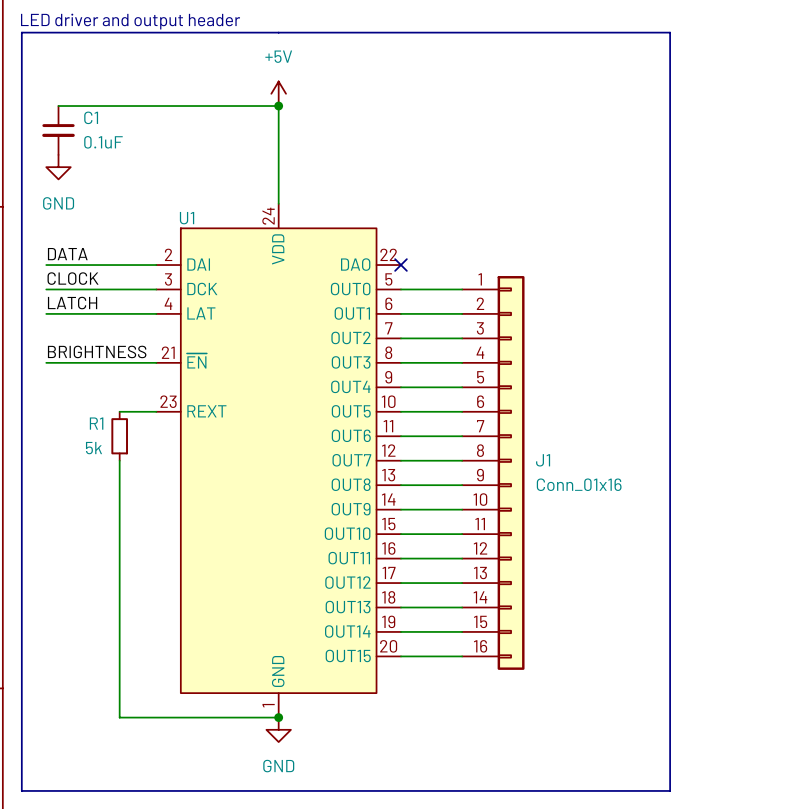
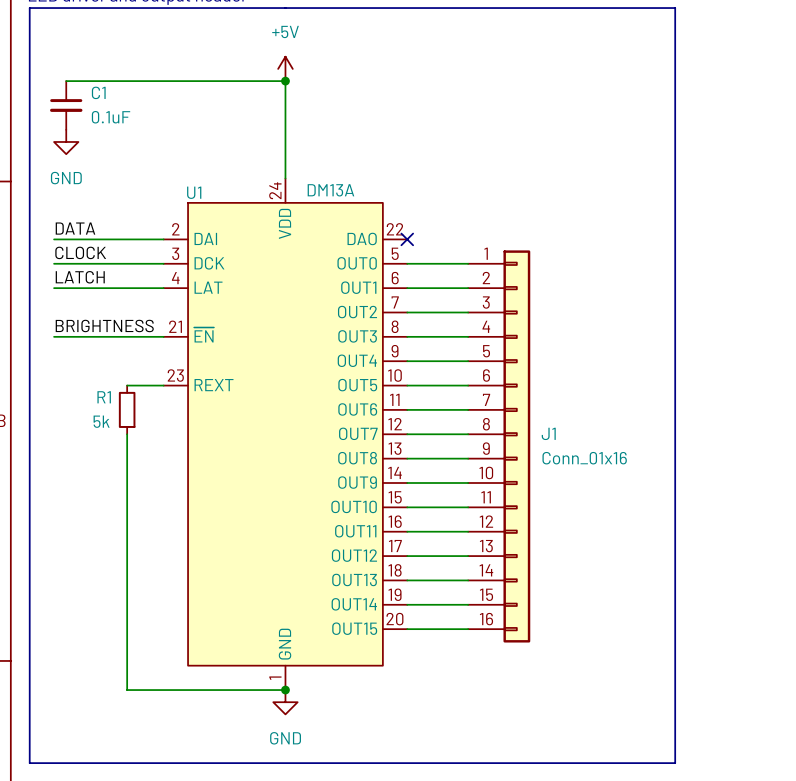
U1 value: none -> DM13A (330, 190)

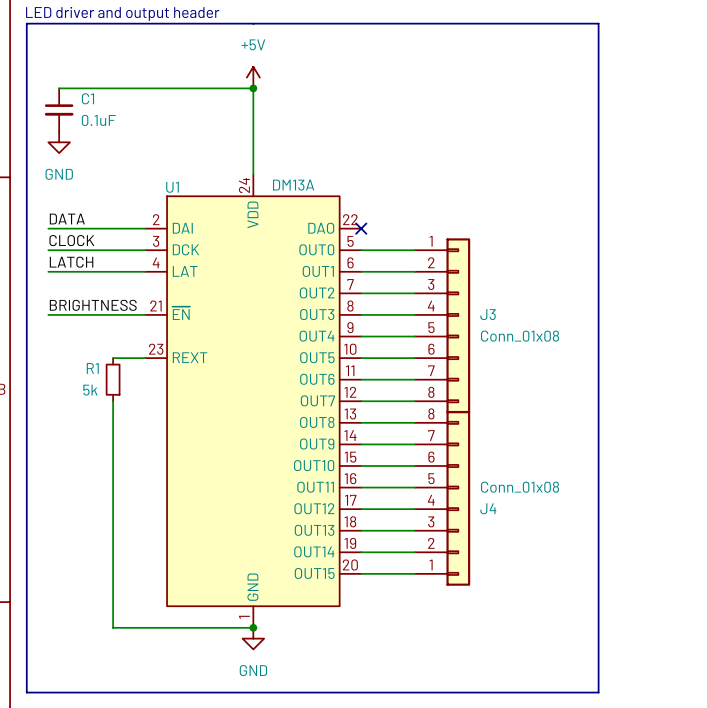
J3: none -> Conn_01x08 (442, 325)
J1: Conn_01x16 (499, 446) -> none
J4: none -> Conn_01x08 (442, 498)

